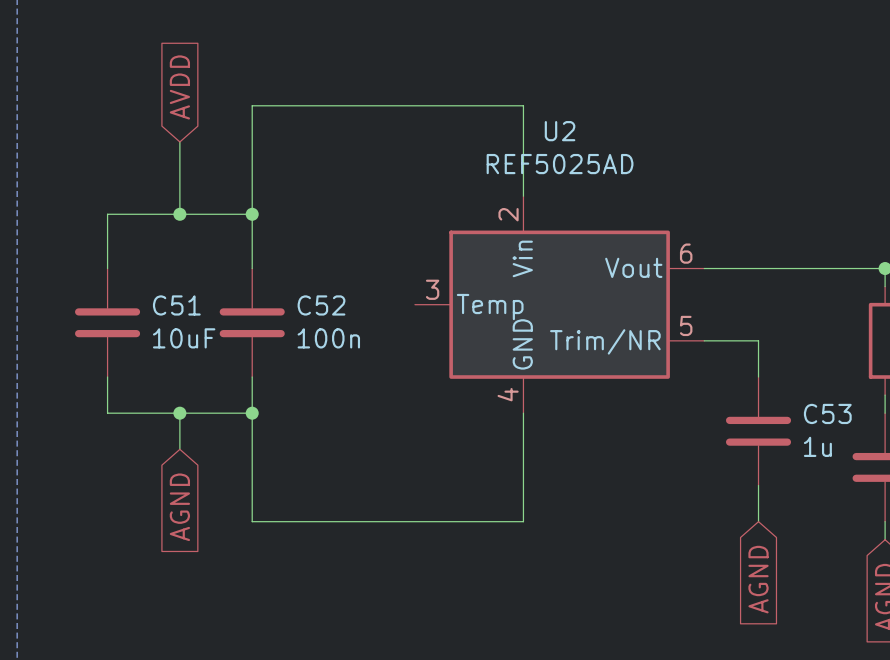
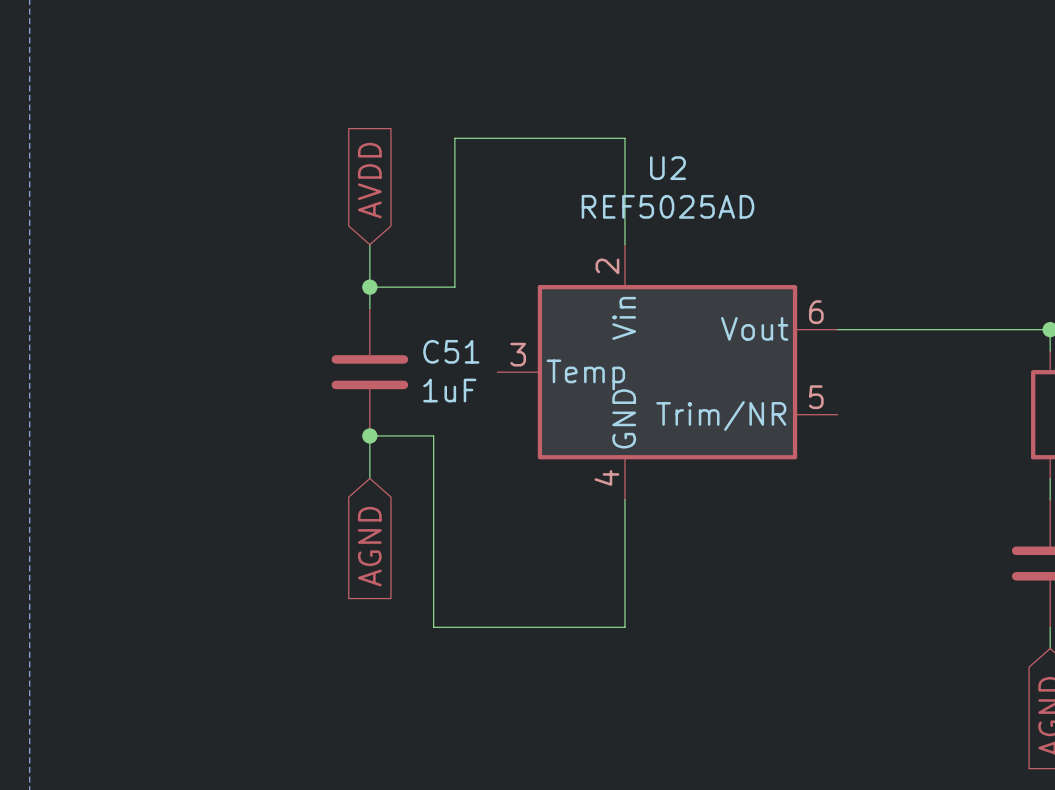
global label position: AVDD (179, 87) -> AVDD (369, 180)
wire: (378, 105) (252, 105) (252, 268) -> (454, 138) (454, 287) (369, 287)
wire: (179, 141) (179, 214) -> none
wire: none -> (369, 244) (369, 308)
junction: (179, 214) -> none
wire: (252, 214) (107, 214) (107, 268) -> none
junction position: (252, 214) -> (369, 287)
C51 position: (107, 322) -> (369, 372)
C52: 100n (252, 322) -> none
C51 value: 10uF (184, 338) -> 1uF (449, 390)
wire: (704, 340) (758, 340) (758, 377) -> none
junction: none -> (369, 435)
wire: (107, 377) (107, 413) (252, 413) -> none
wire: (252, 377) (252, 521) (360, 521) -> (369, 478) (369, 435) (433, 435) (433, 627)
wire: (179, 413) (179, 449) -> none
junction: (179, 413) -> none
junction: (252, 413) -> none
C53: 1u (758, 431) -> none
wire: (758, 485) (758, 521) -> none
global label position: AGND (179, 507) -> AGND (369, 546)
global label: AGND (758, 579) -> none

